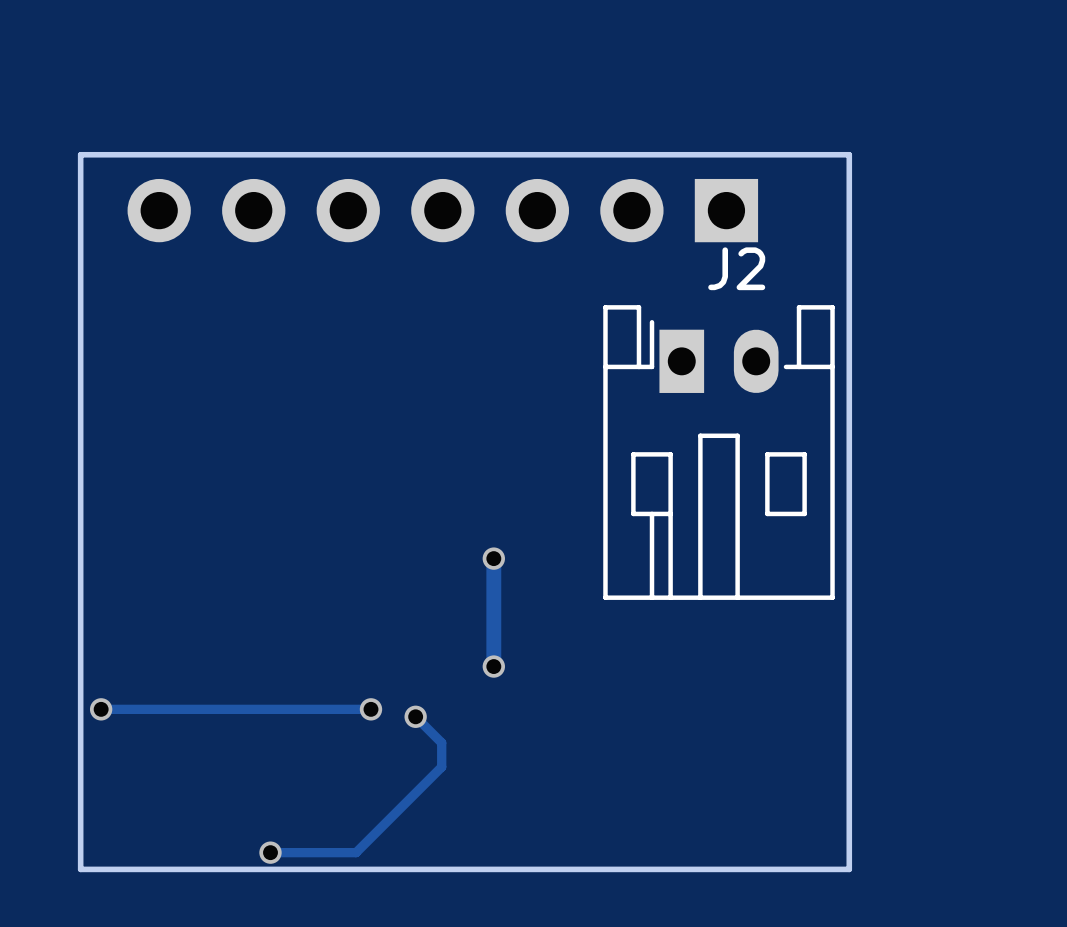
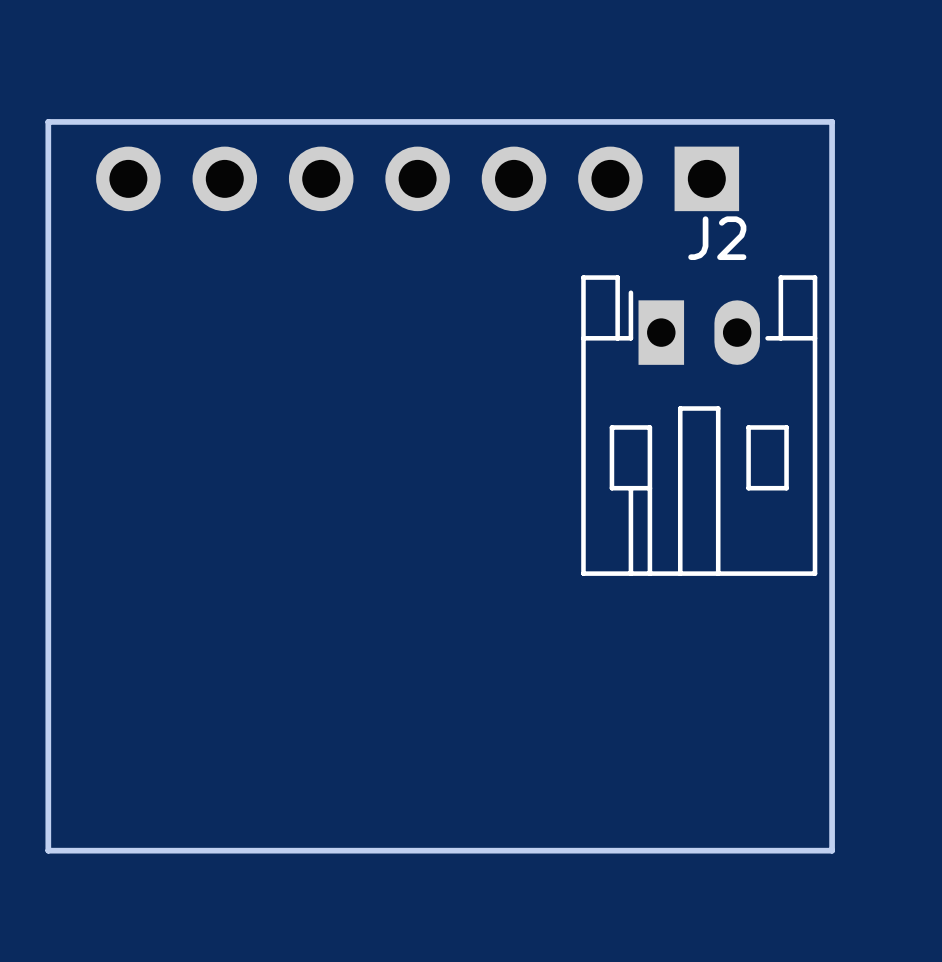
track: (493, 558) (493, 666) -> none
via: (493, 558) -> none
via: (493, 666) -> none
via: (101, 709) -> none
track: (370, 709) (101, 709) -> none
via: (370, 709) -> none
track: (415, 716) (441, 742) (441, 767) (356, 852) (270, 852) -> none
via: (415, 716) -> none
via: (270, 852) -> none

